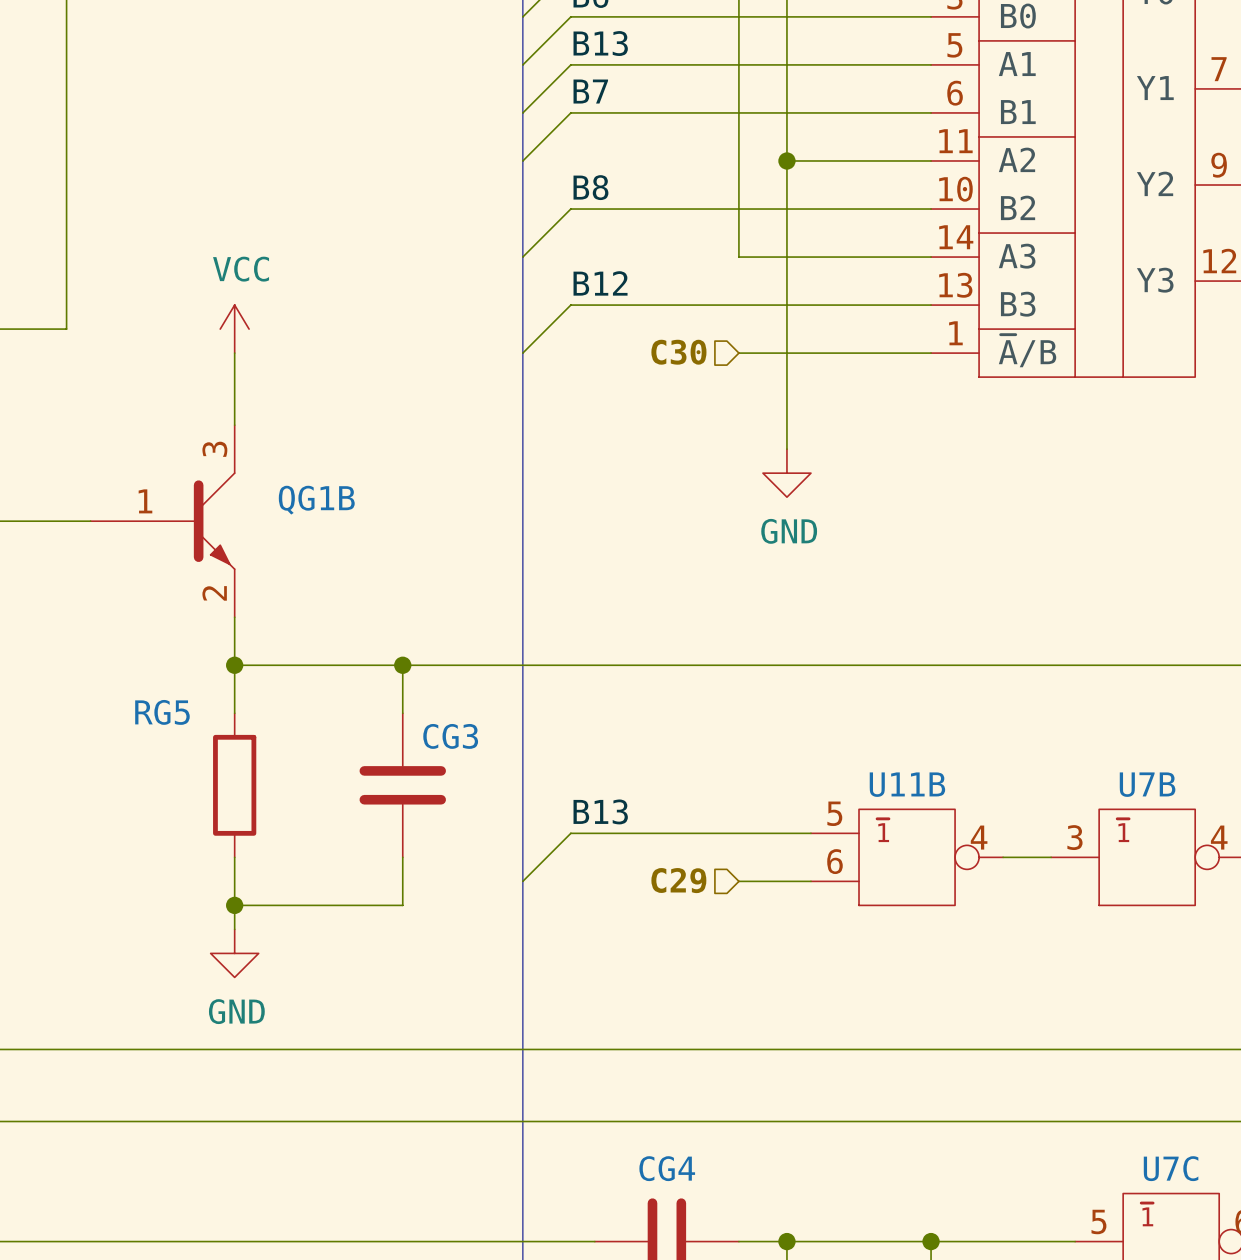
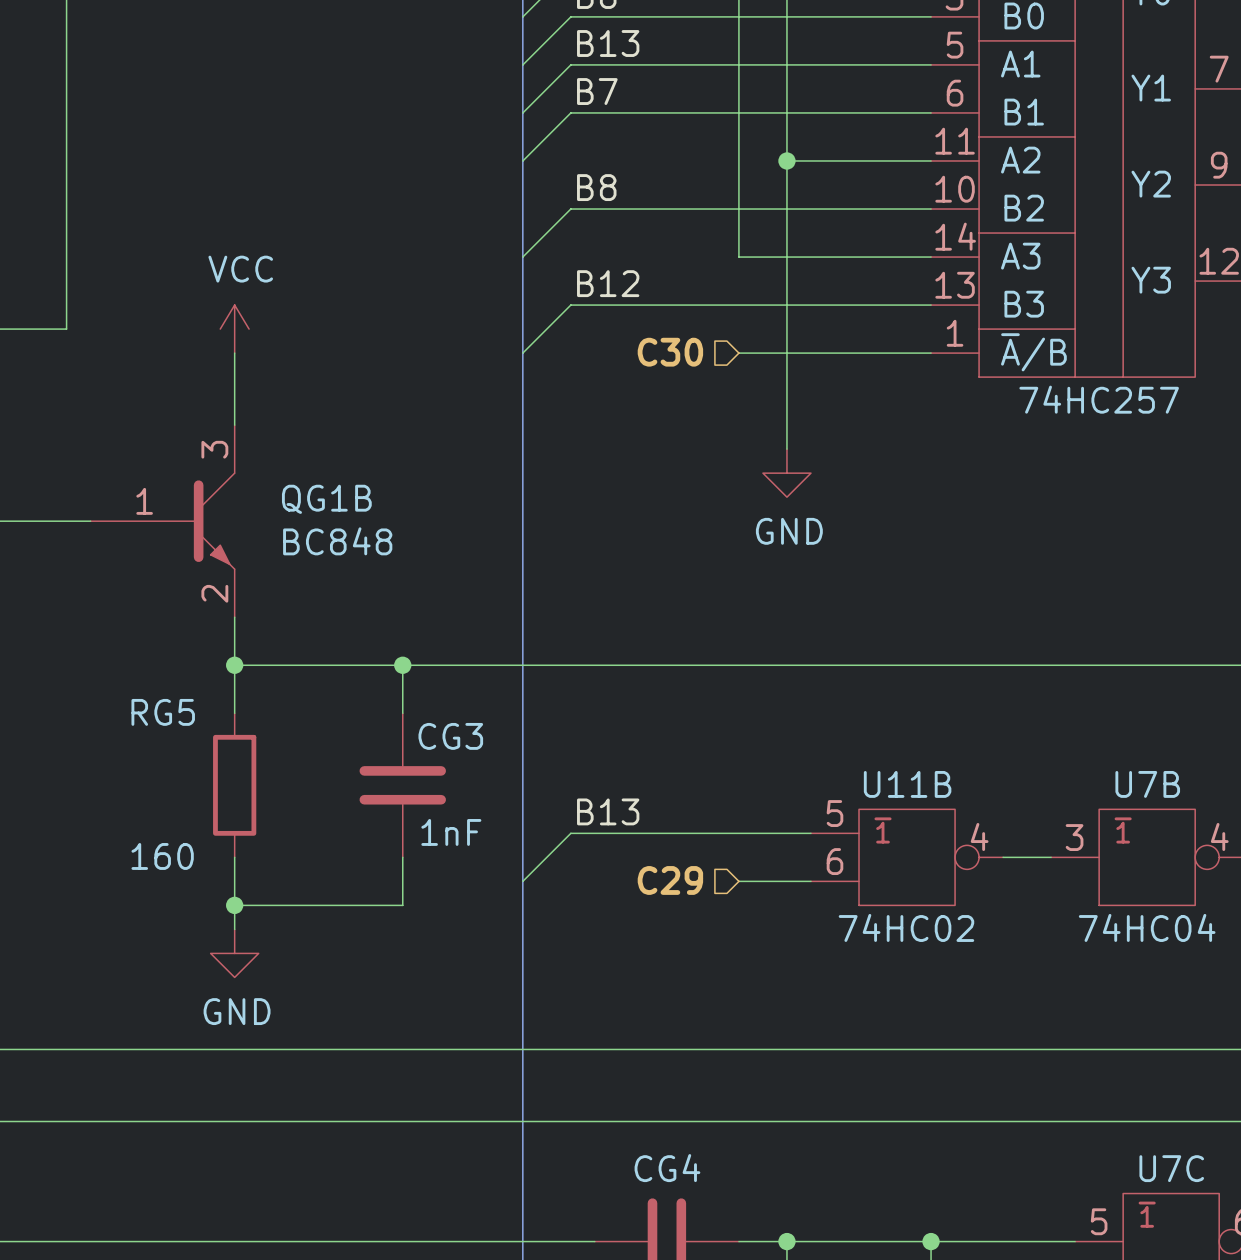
part value: none -> 74HC257 (1099, 399)
QG1B value: none -> BC848 (337, 541)
CG3 value: none -> 1nF (451, 832)
RG5 value: none -> 160 (162, 856)
U11B value: none -> 74HC02 (906, 927)
U7B value: none -> 74HC04 (1147, 927)

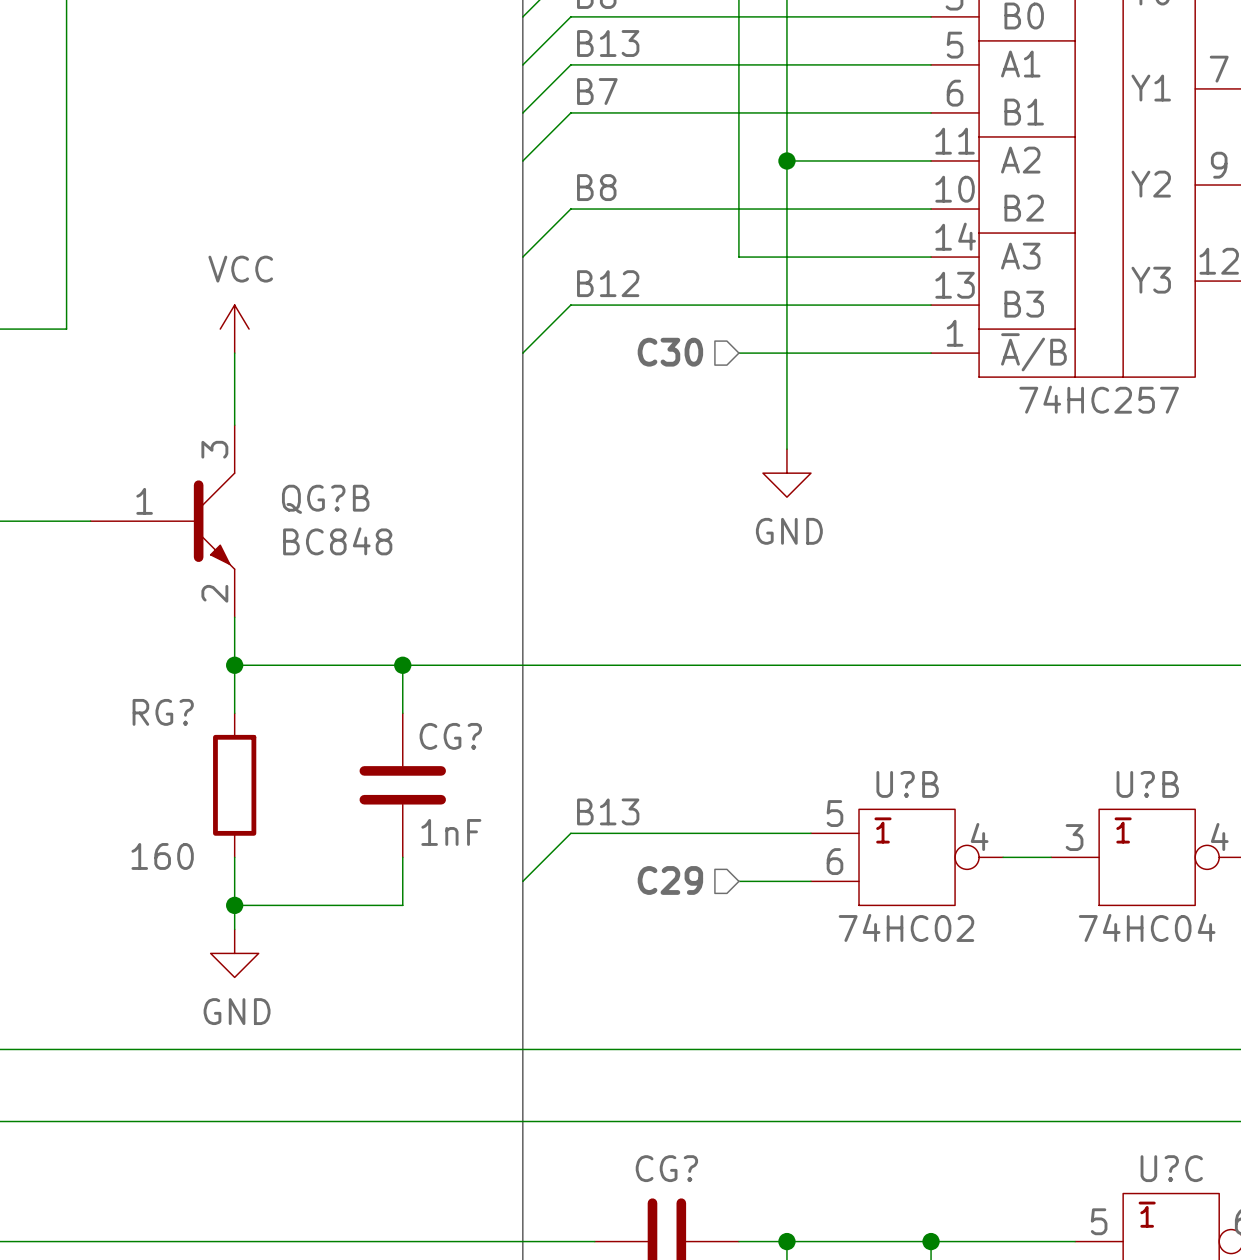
QG1B name: QG1B (326, 499) -> QG?B (325, 499)
RG5 name: RG5 (163, 712) -> RG? (163, 712)
CG3 name: CG3 (450, 736) -> CG? (450, 736)
U11B name: U11B (907, 784) -> U?B (907, 784)
U7B name: U7B (1147, 784) -> U?B (1147, 784)
CG4 name: CG4 (667, 1168) -> CG? (666, 1168)
U7C name: U7C (1171, 1168) -> U?C (1171, 1168)

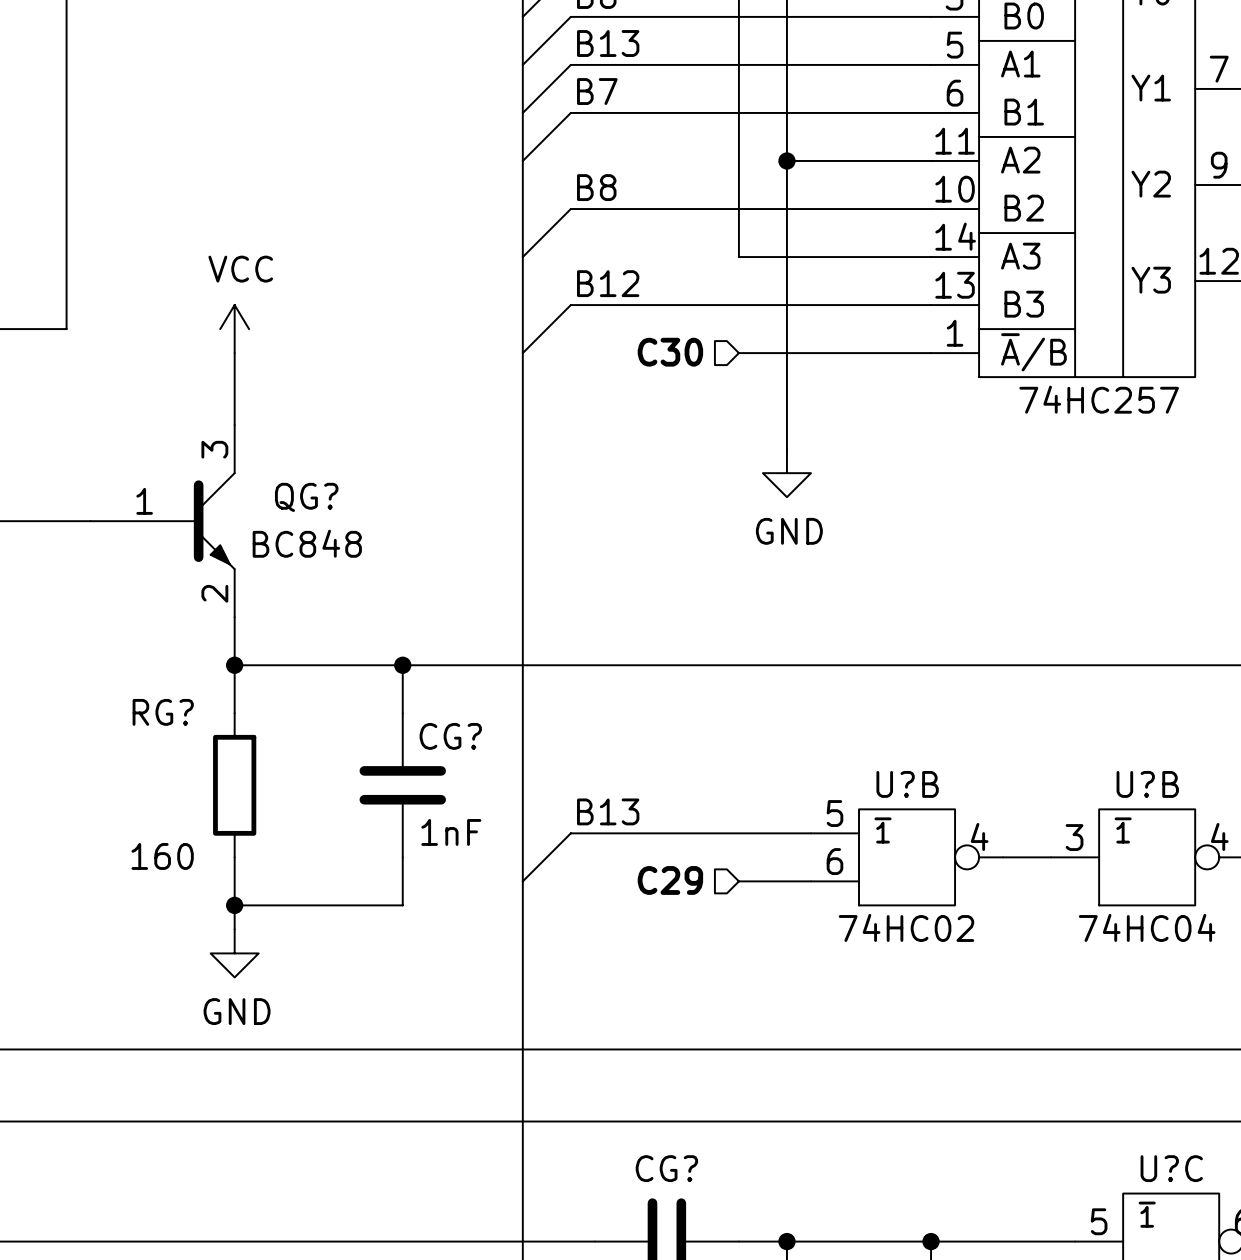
QG?B name: QG?B (325, 499) -> QG? (306, 497)
QG?B value position: BC848 (337, 541) -> BC848 (307, 543)

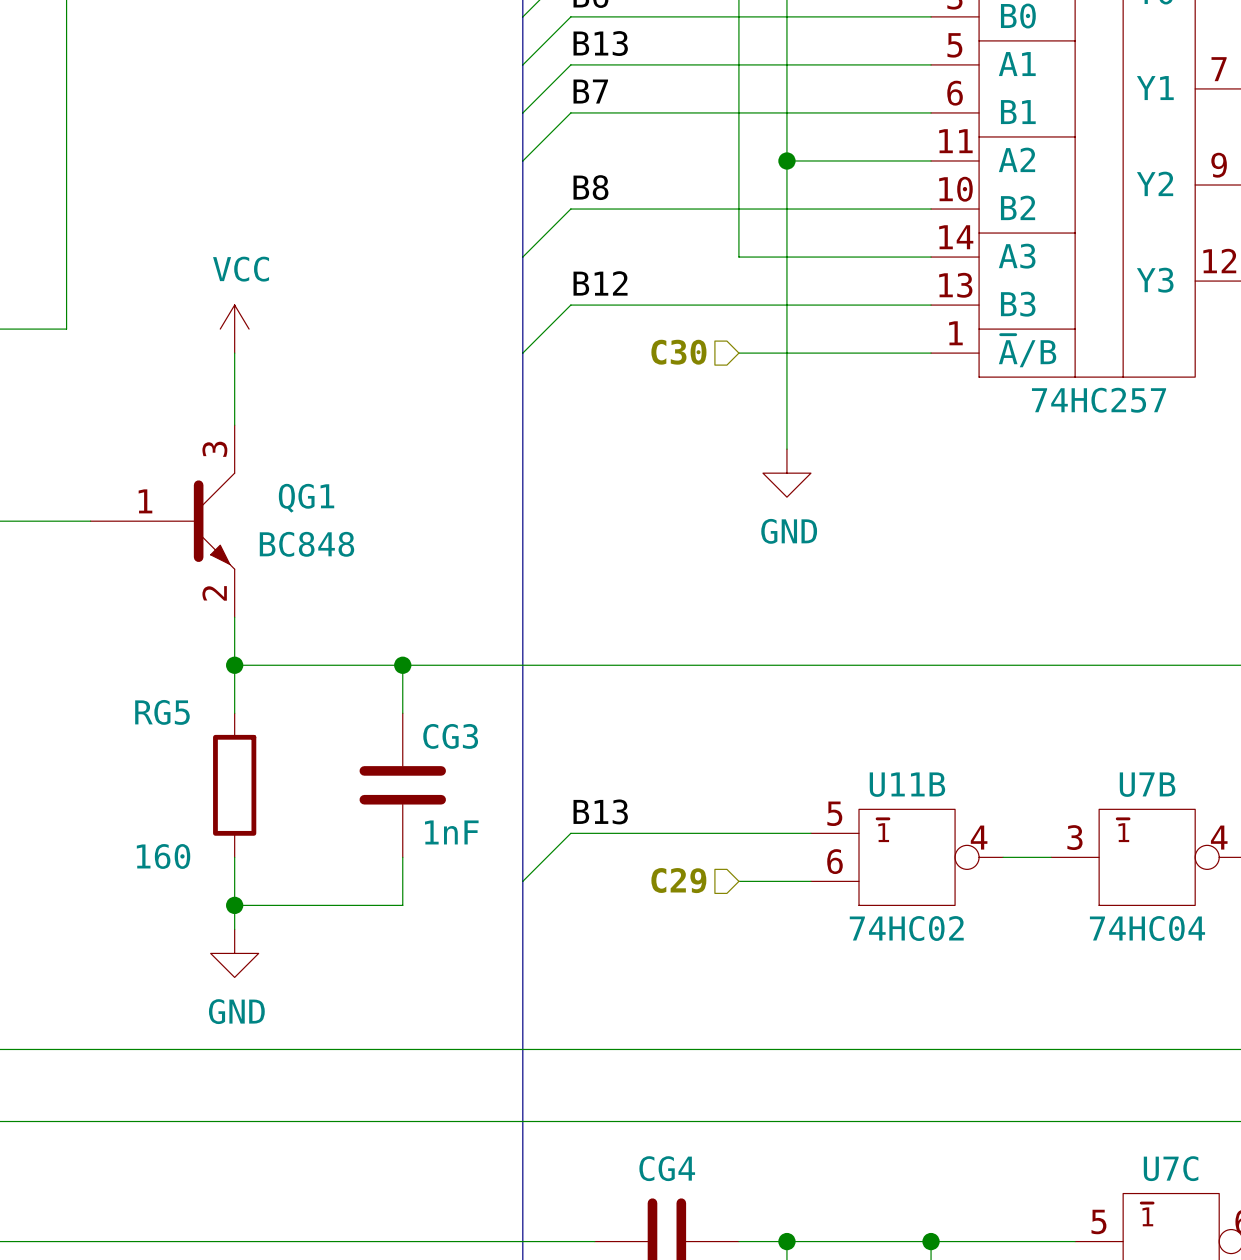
QG? name: QG? (306, 497) -> QG1 (306, 498)
RG? name: RG? (163, 712) -> RG5 (162, 712)
CG? name: CG? (450, 736) -> CG3 (450, 736)
U?B name: U?B (907, 784) -> U11B (907, 784)
U?B name: U?B (1147, 784) -> U7B (1147, 784)
CG? name: CG? (666, 1168) -> CG4 (667, 1168)
U?C name: U?C (1171, 1168) -> U7C (1171, 1168)

